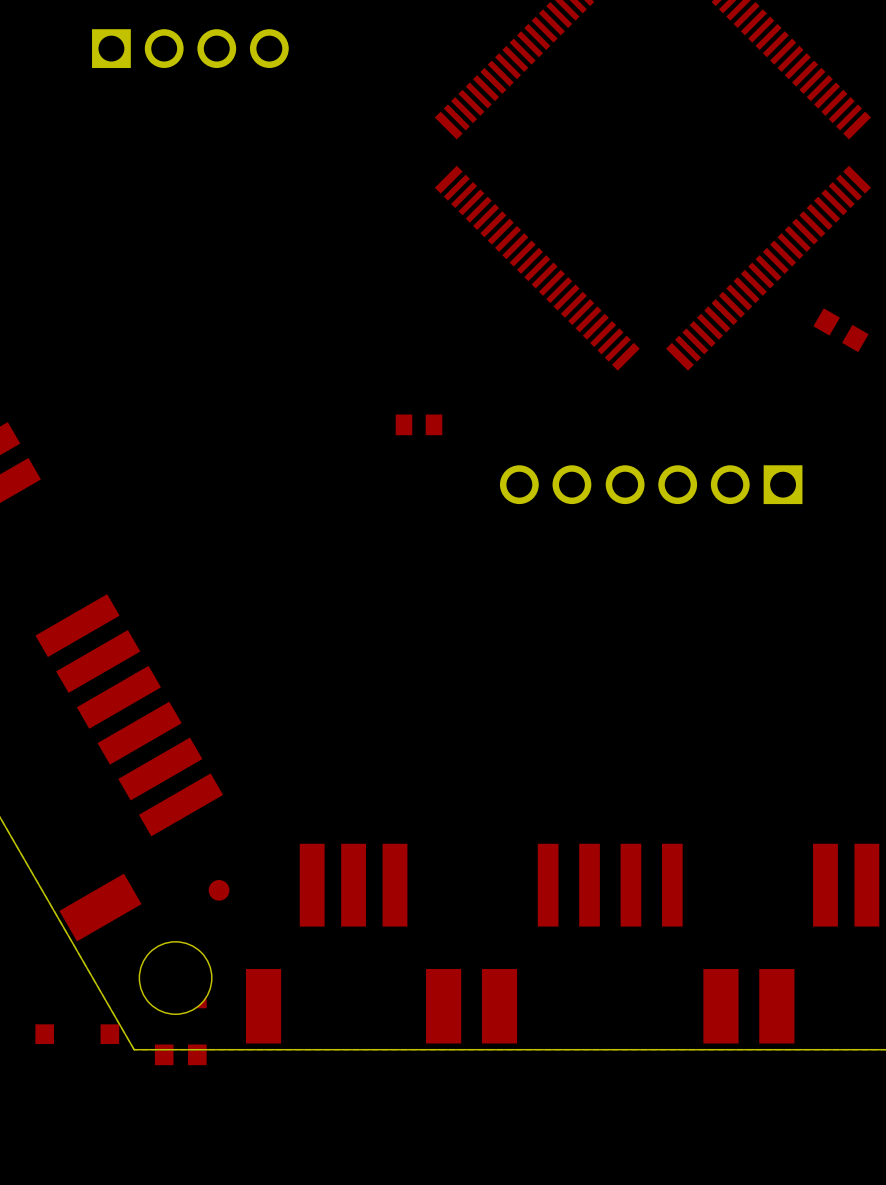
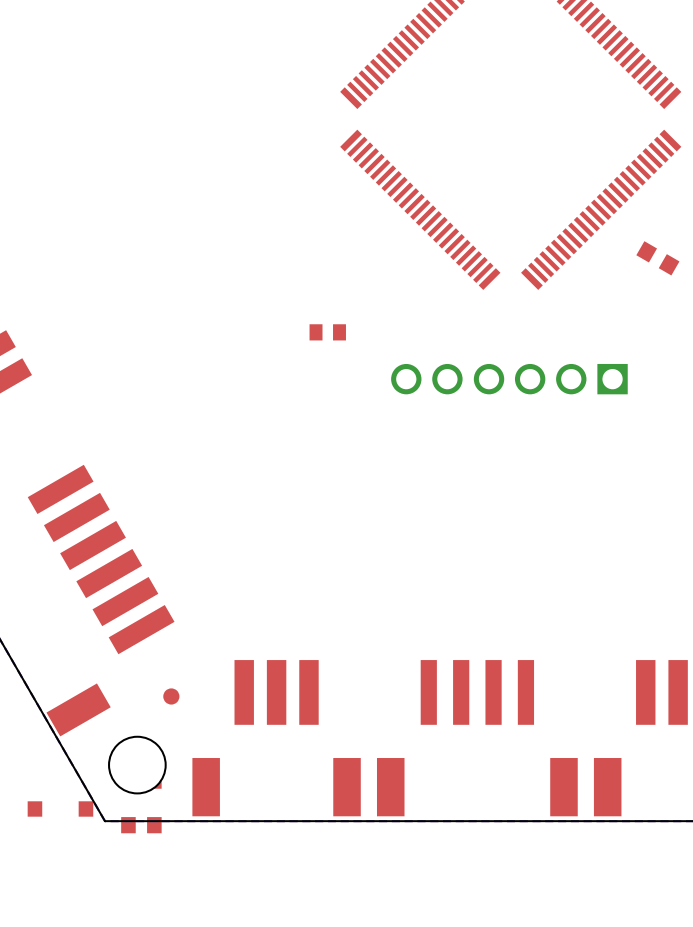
part: (190, 48) -> none

